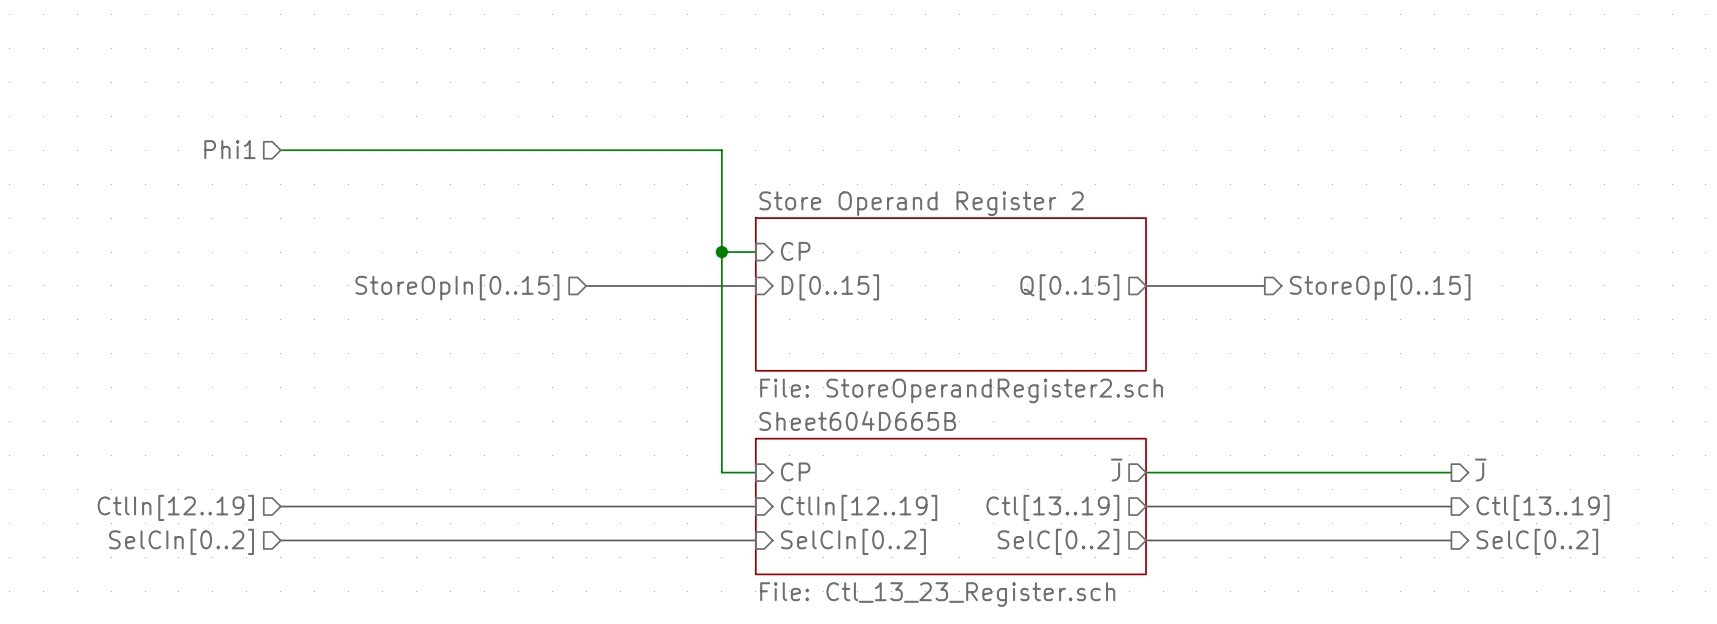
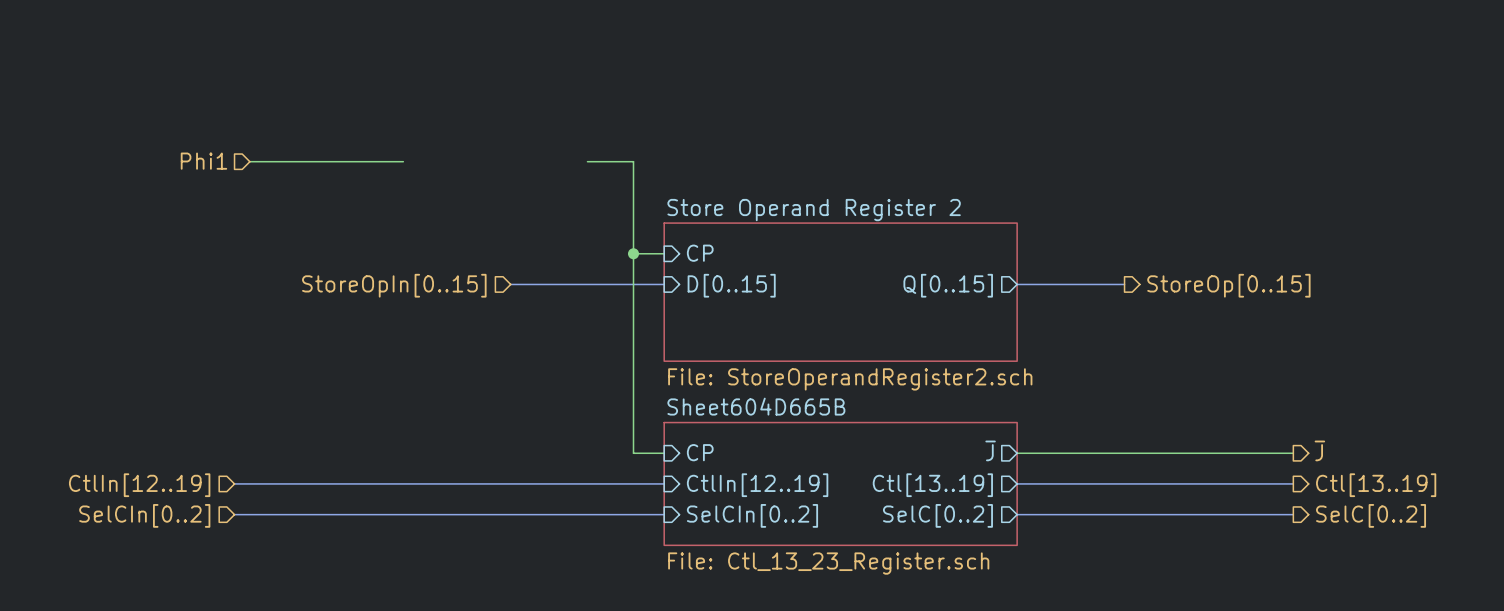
hierarchical label position: Phi1 (229, 149) -> Phi1 (203, 161)
wire: (280, 150) (297, 150) -> none
wire: (467, 150) (670, 150) -> none

